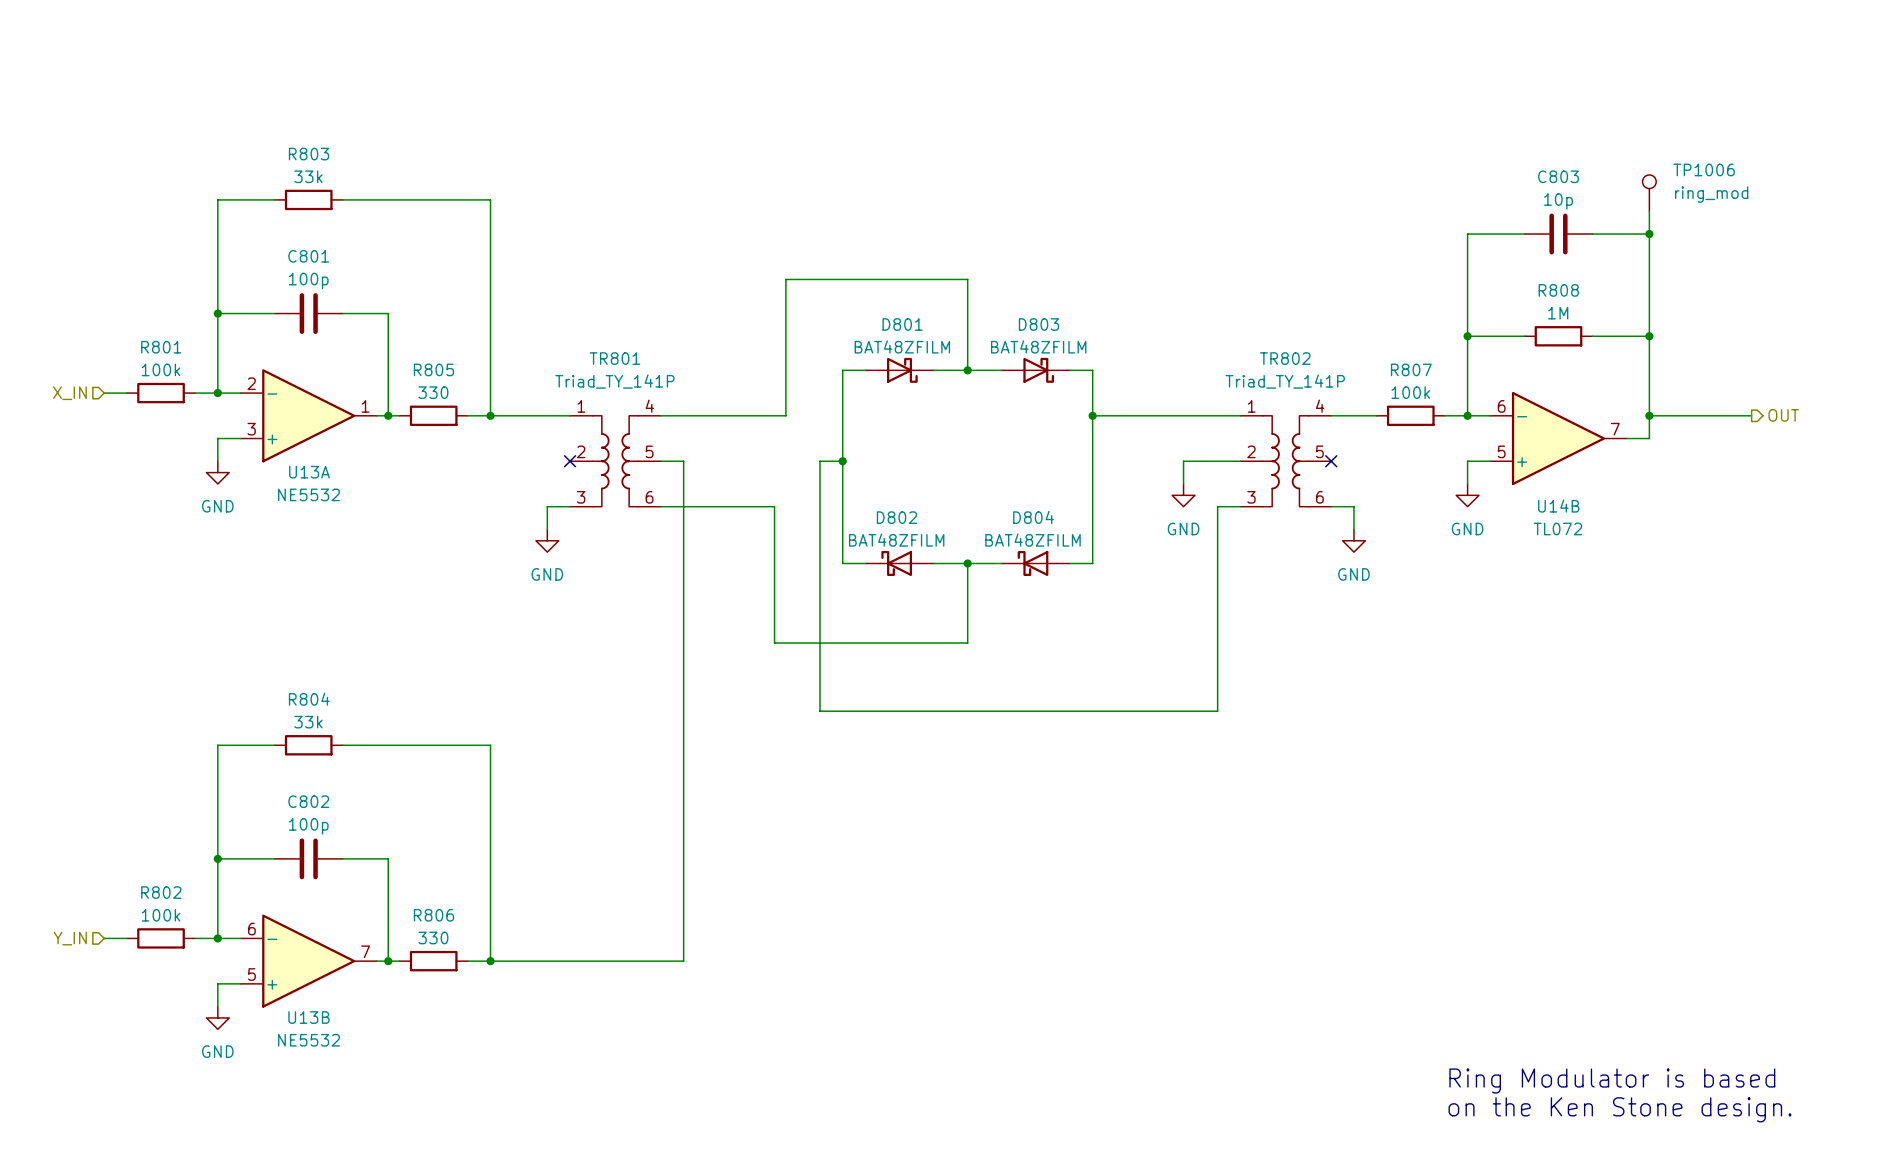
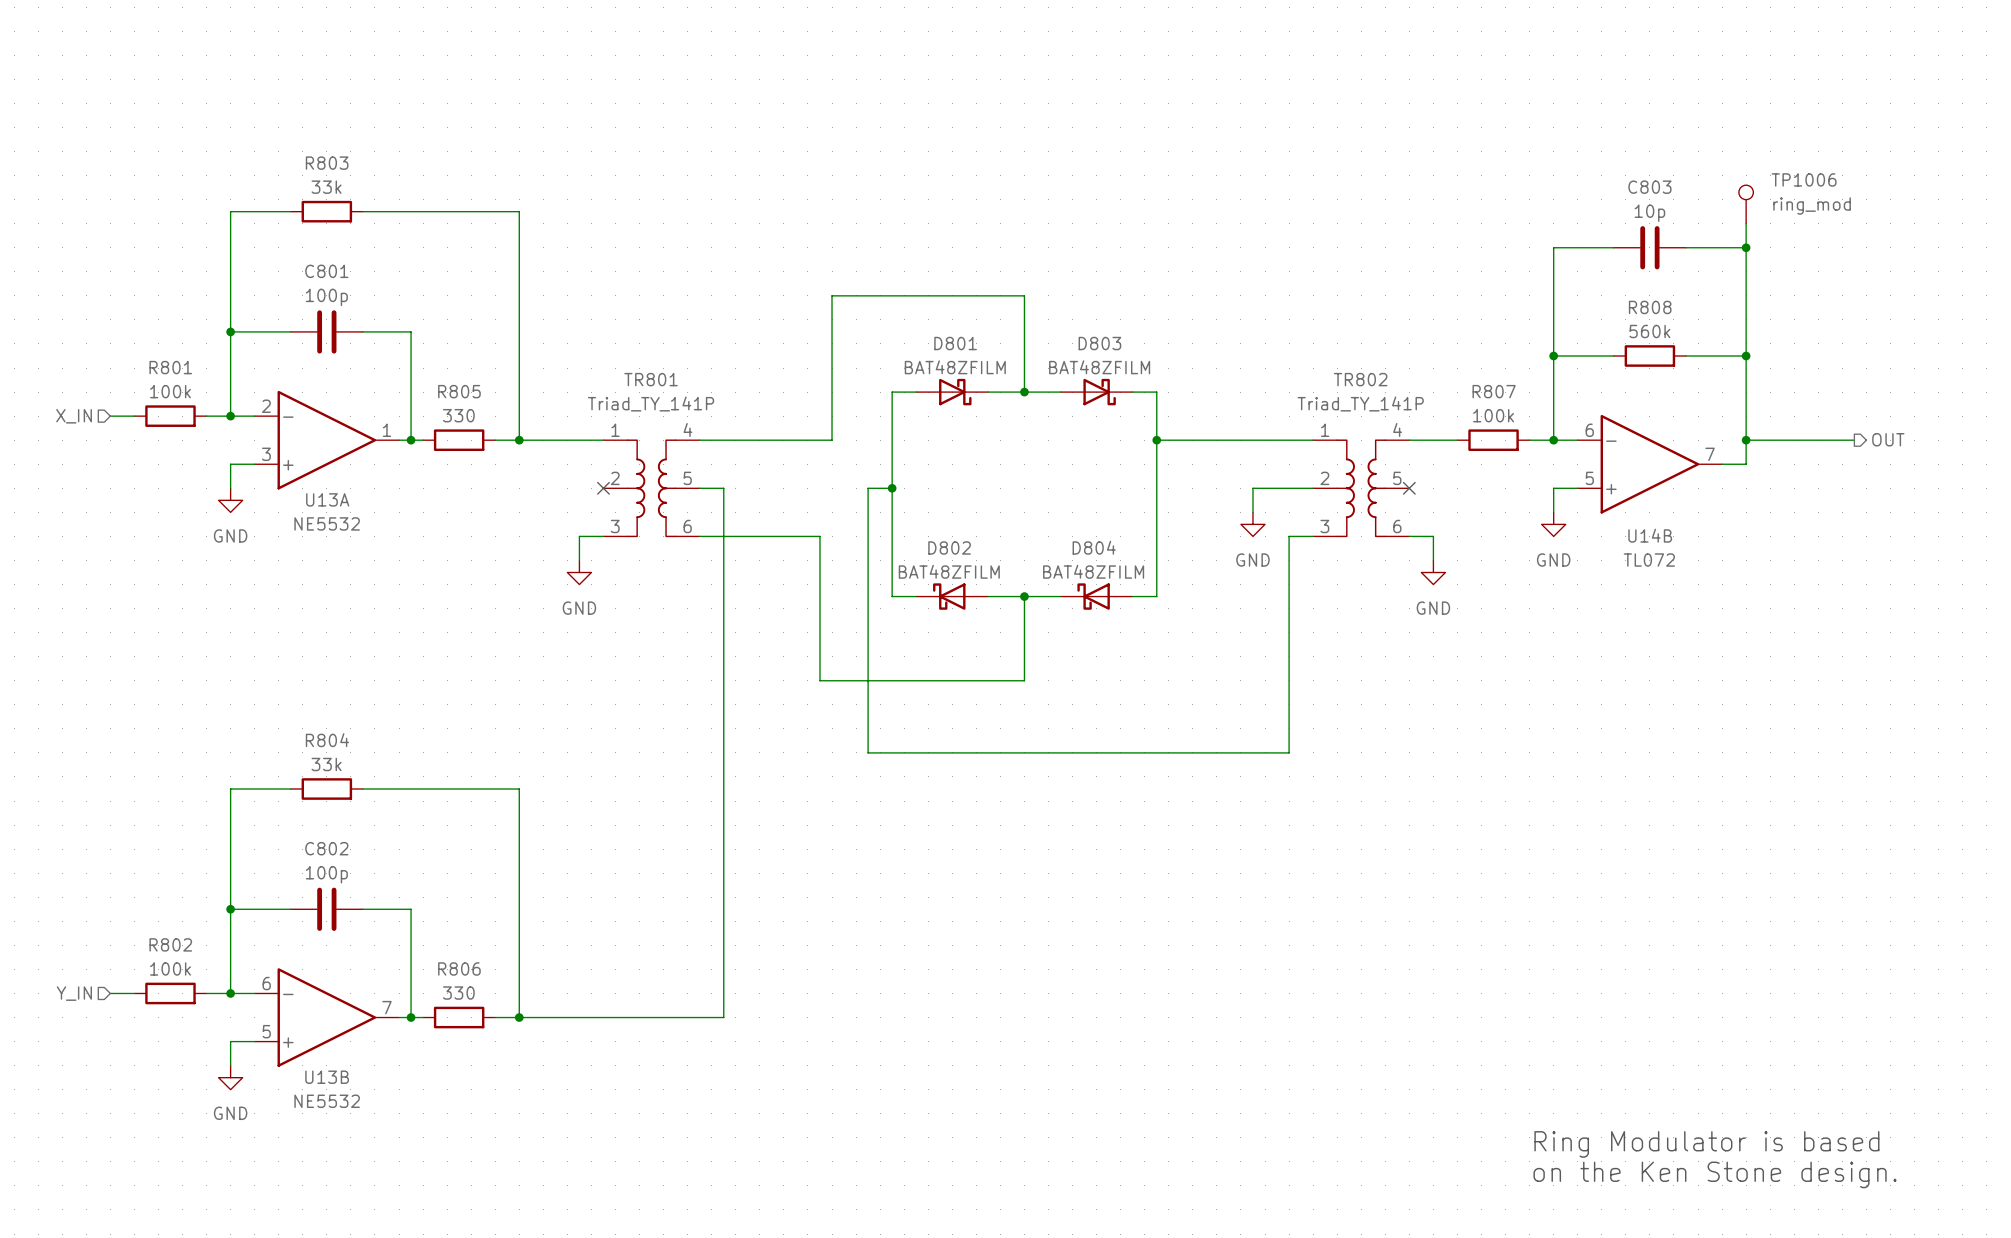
R808 value: 1M (1558, 313) -> 560k (1649, 331)

